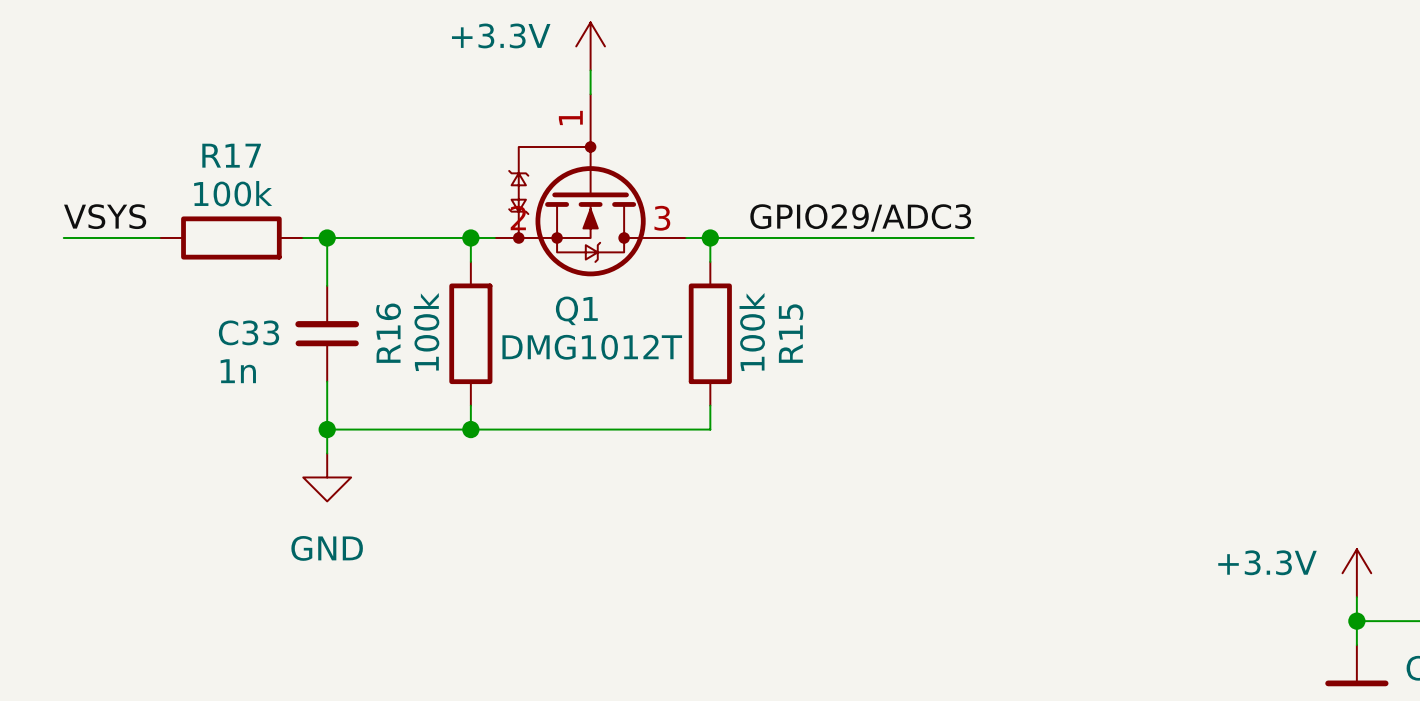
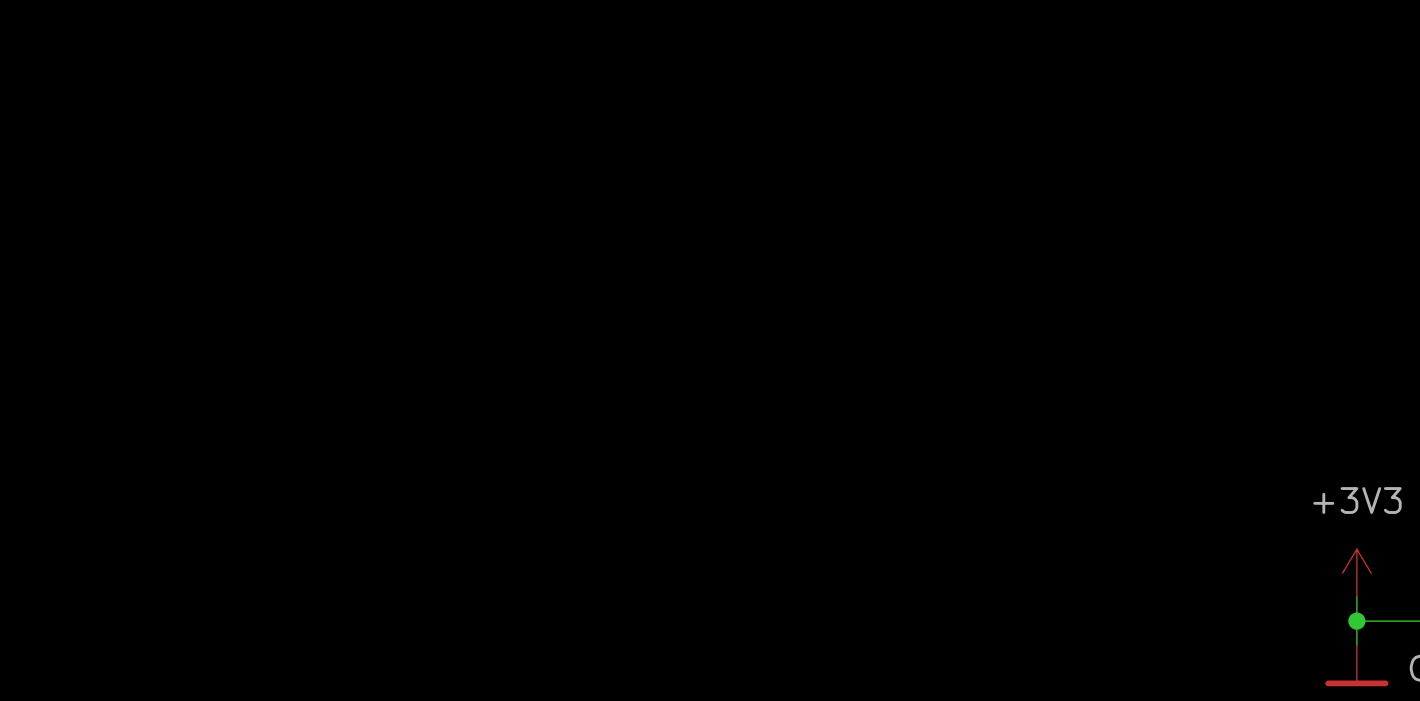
power symbol: +3.3V (590, 46) -> none
wire: (590, 70) (590, 94) -> none
Q1: DMG1012T (590, 185) -> none
label: VSYS (105, 216) -> none
label: GPIO29/ADC3 (860, 217) -> none
wire: (63, 237) (159, 237) -> none
R17: 100k (231, 237) -> none
wire: (303, 237) (494, 237) -> none
wire: (327, 237) (327, 285) -> none
junction: (327, 237) -> none
wire: (470, 237) (470, 261) -> none
junction: (470, 237) -> none
wire: (686, 237) (973, 237) -> none
wire: (710, 237) (710, 261) -> none
junction: (710, 237) -> none
C33: 1n (327, 333) -> none
R16: 100k (470, 333) -> none
R15: 100k (710, 333) -> none
wire: (327, 381) (327, 453) -> none
wire: (470, 405) (470, 429) -> none
wire: (710, 405) (710, 429) (327, 429) -> none
junction: (327, 429) -> none
junction: (470, 429) -> none
power symbol: GND (327, 477) -> none
power symbol: +3.3V (1356, 573) -> +3V3 (1356, 573)

